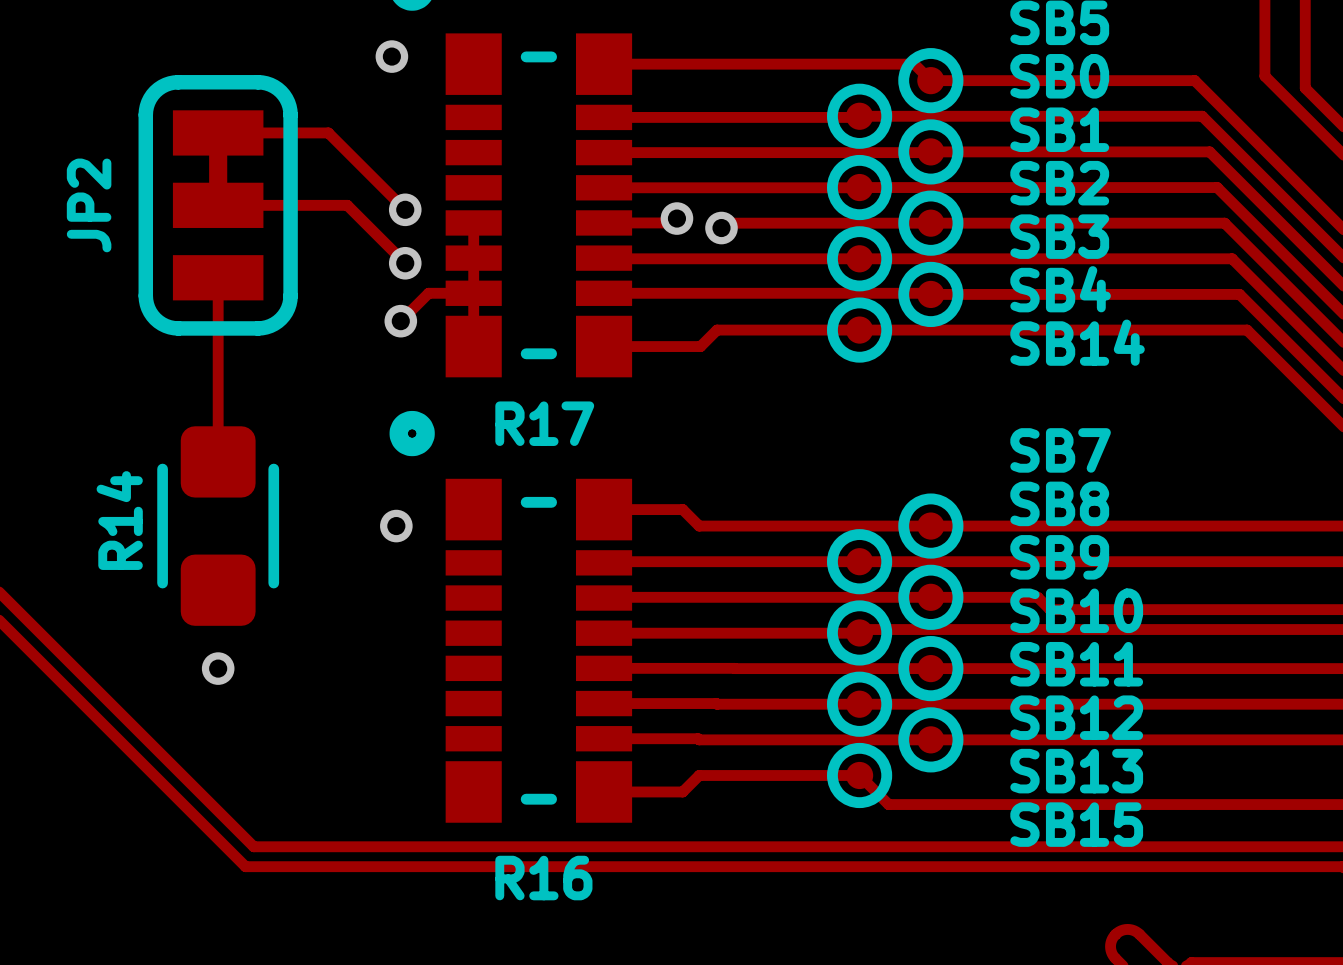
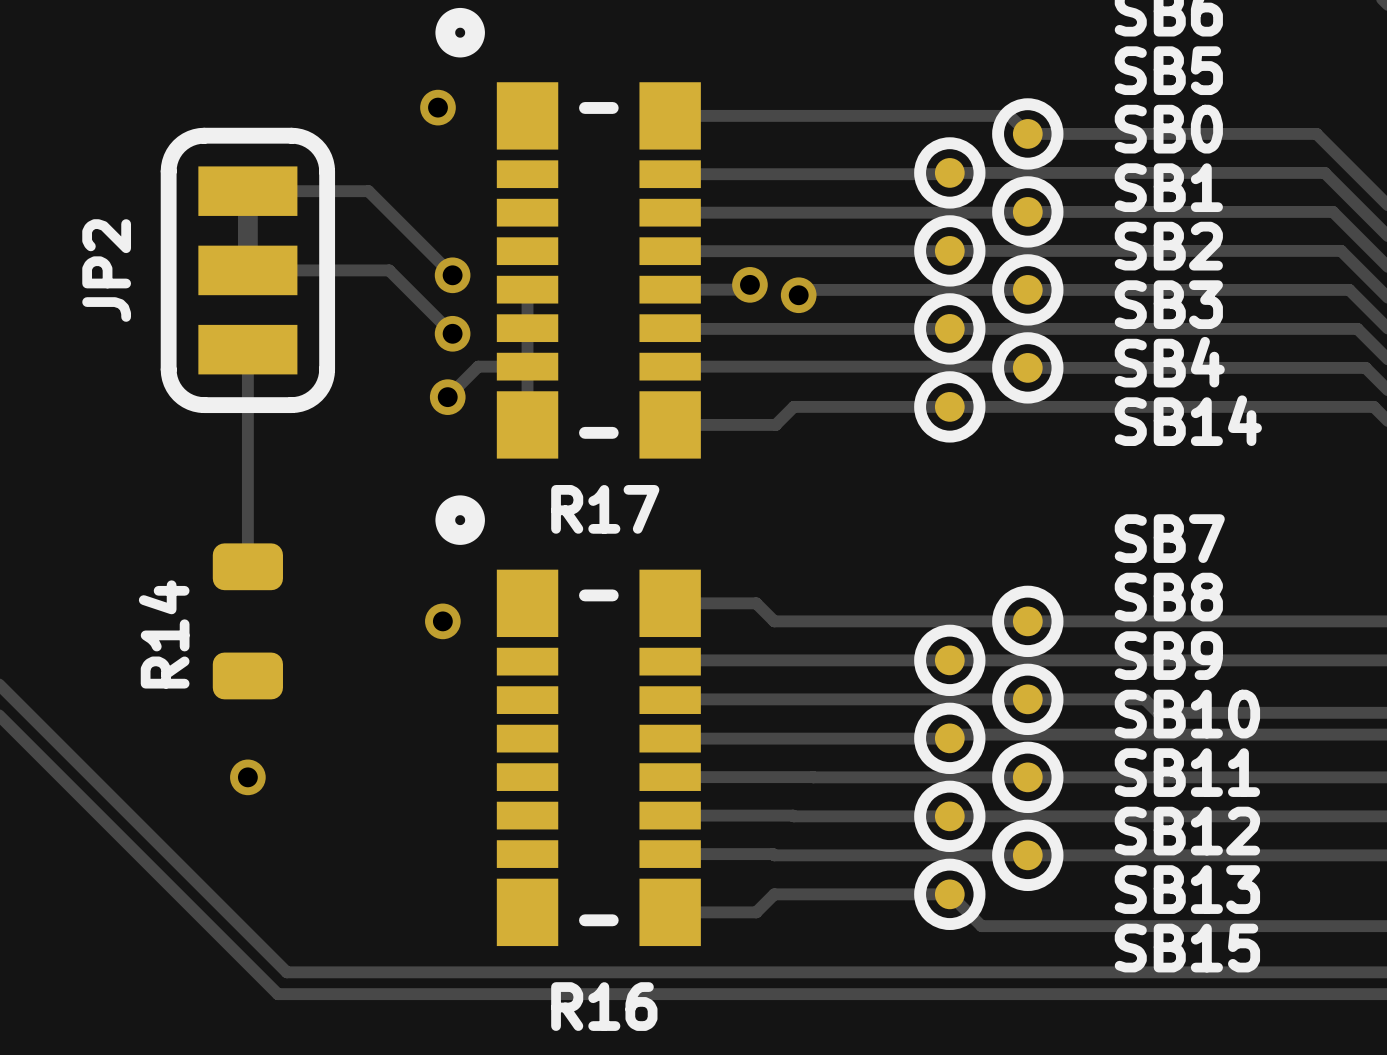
R14 footprint: [157, 426, 280, 626] -> [212, 543, 283, 700]

